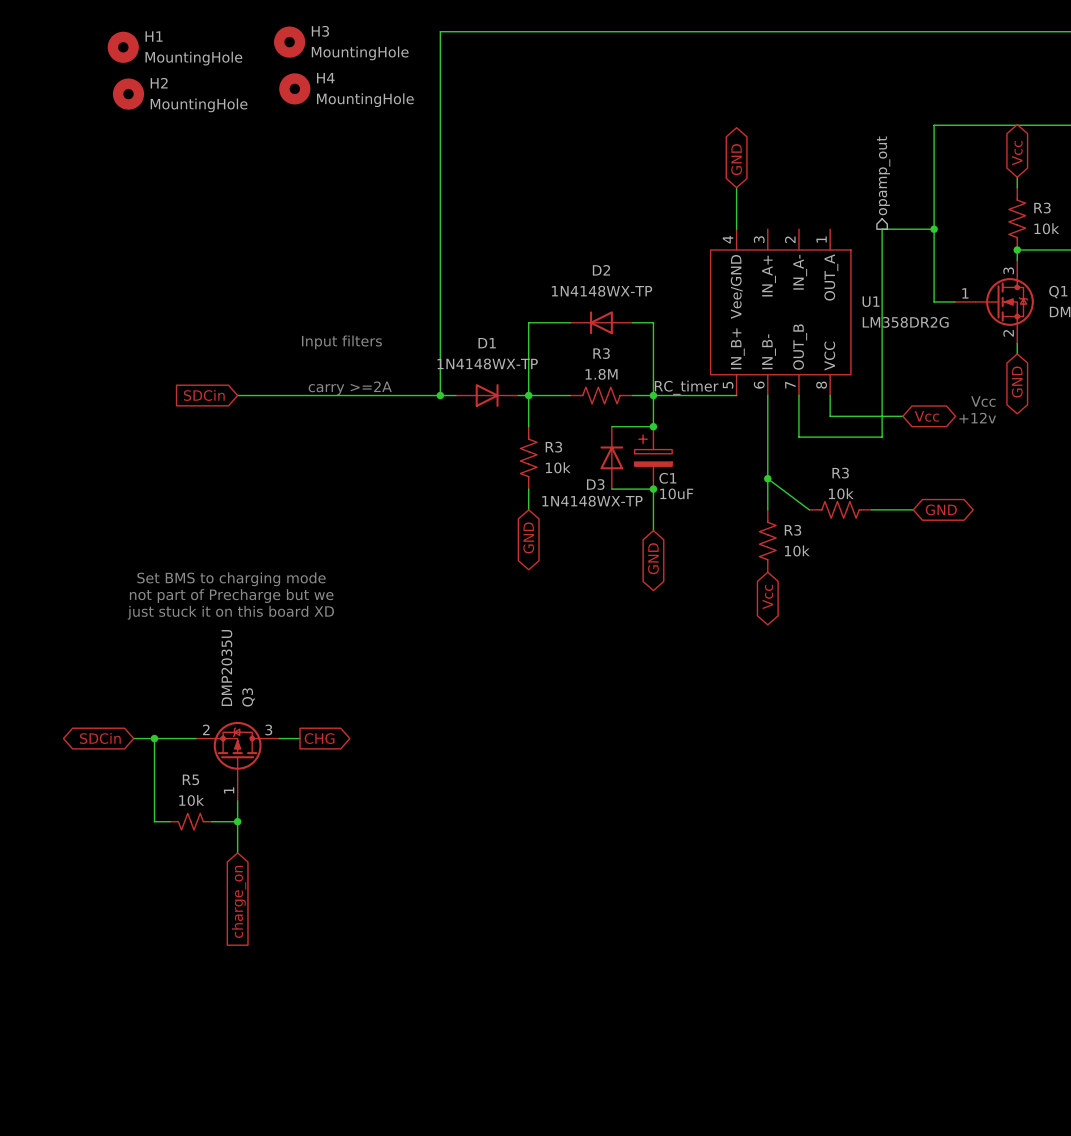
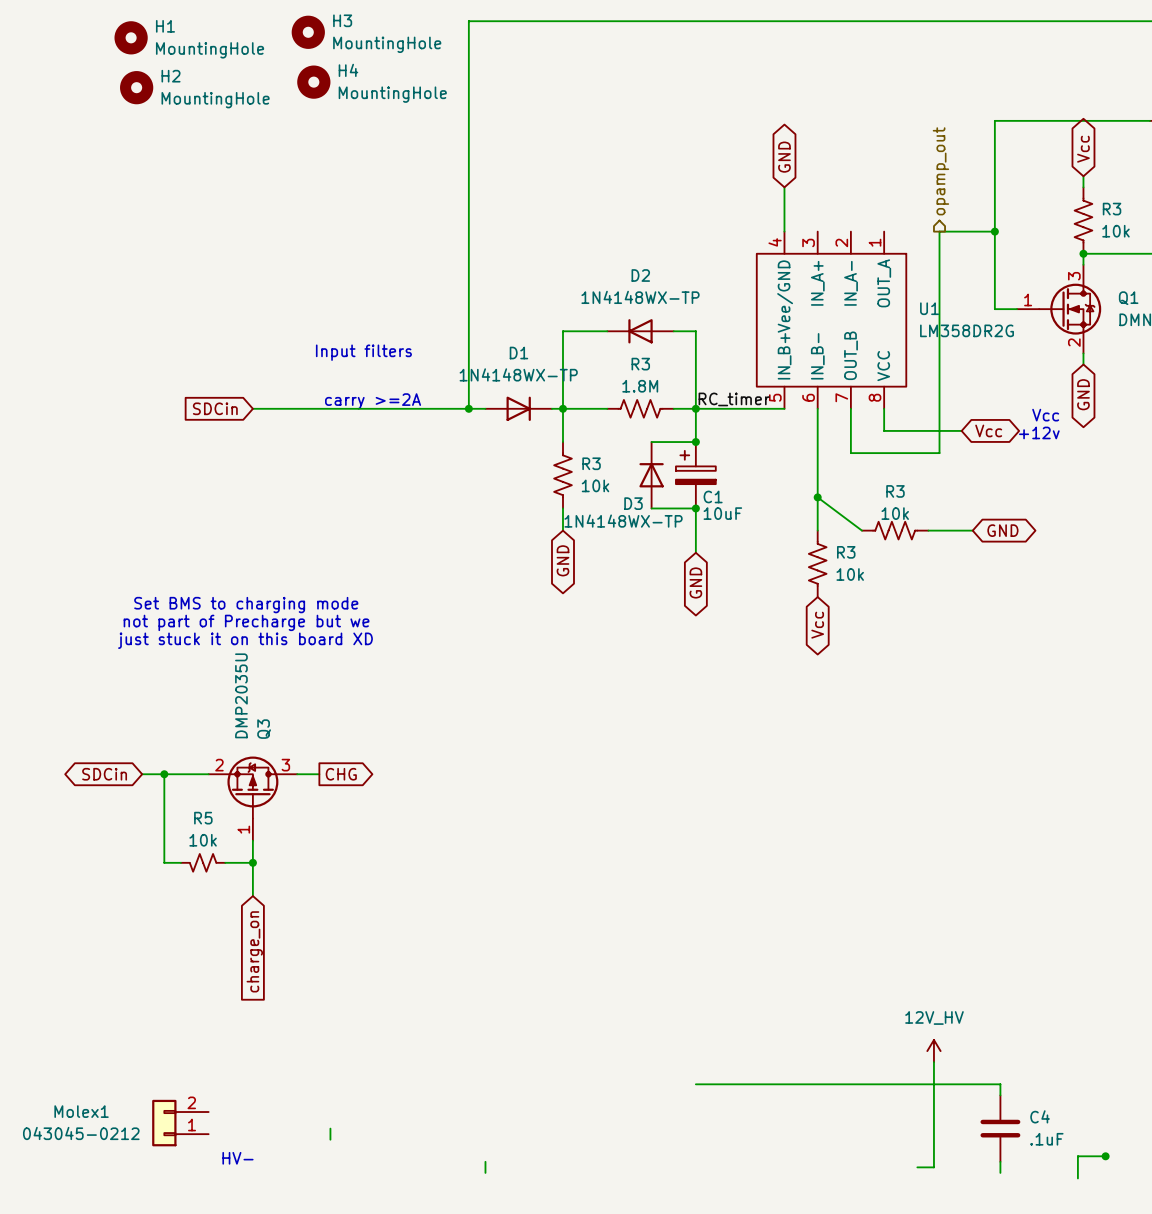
power symbol: none -> 12V_HV (933, 1051)
wire: none -> (933, 1062) (933, 1167) (917, 1167)
wire: none -> (695, 1084) (1000, 1084) (1000, 1095)
Molex1: none -> 043045-0212 (180, 1123)
wire: none -> (330, 1128) (330, 1139)
C4: none -> .1uF (1000, 1128)
wire: none -> (1105, 1156) (1077, 1156) (1077, 1178)
junction: none -> (1105, 1156)
text: none -> HV- (237, 1158)
wire: none -> (485, 1161) (485, 1172)
wire: none -> (1000, 1161) (1000, 1172)

